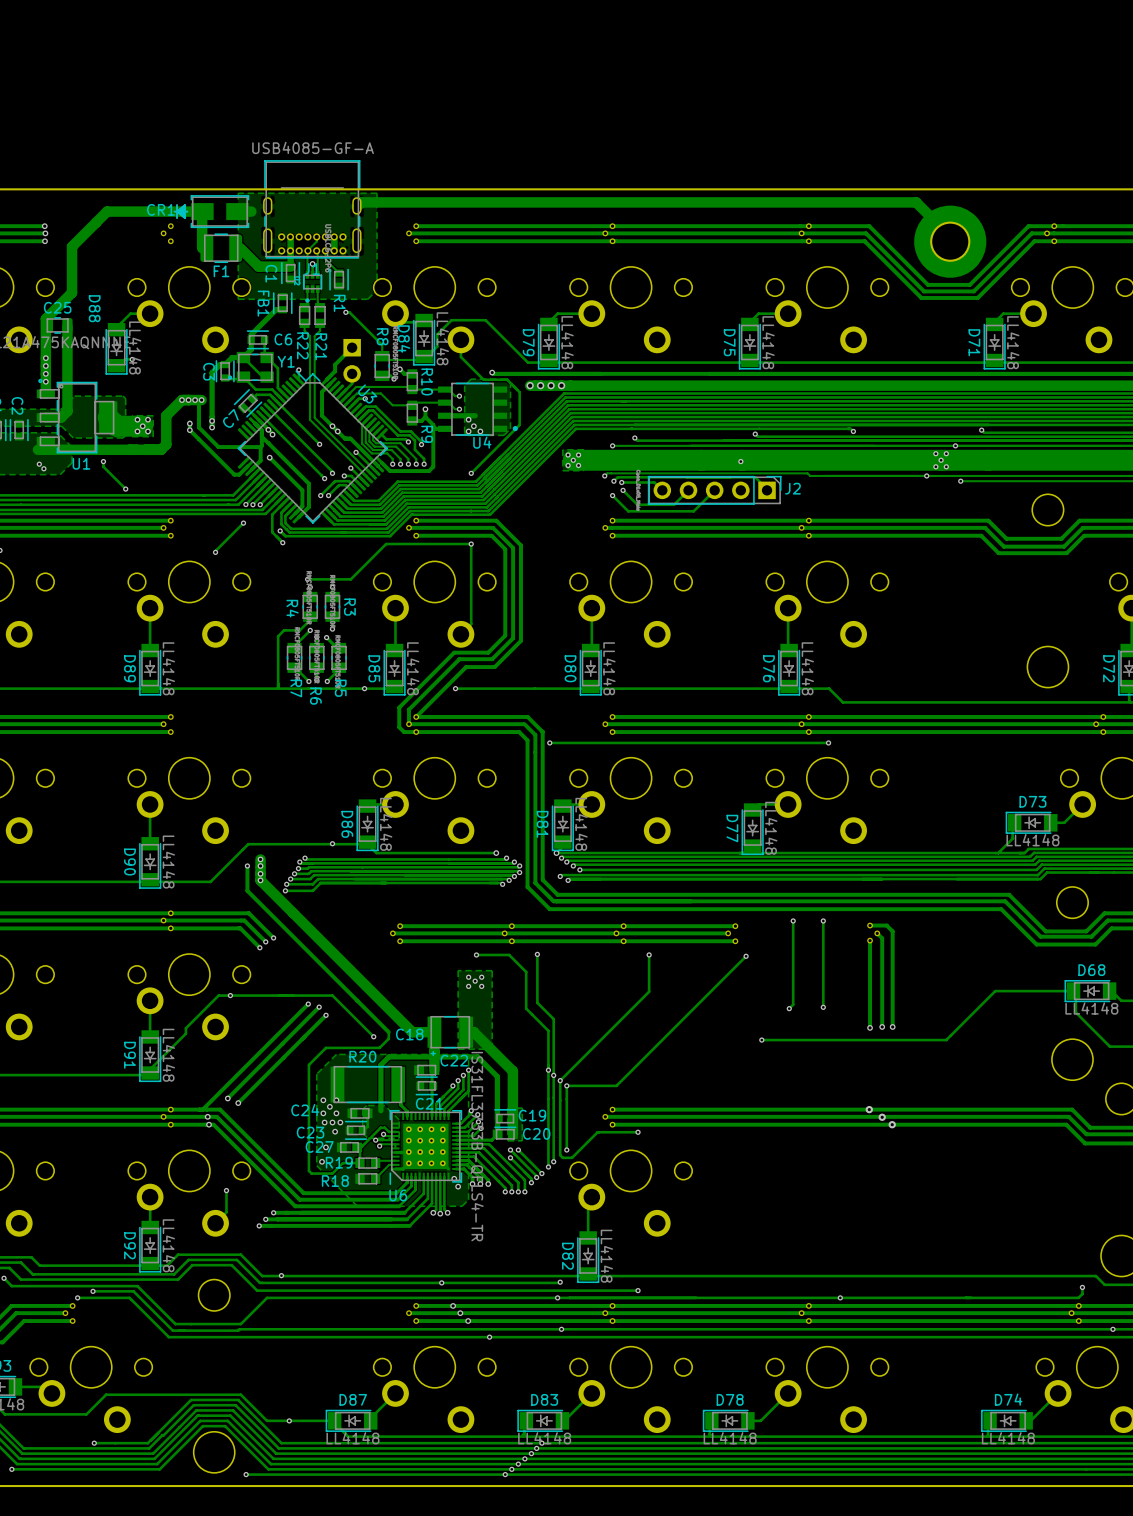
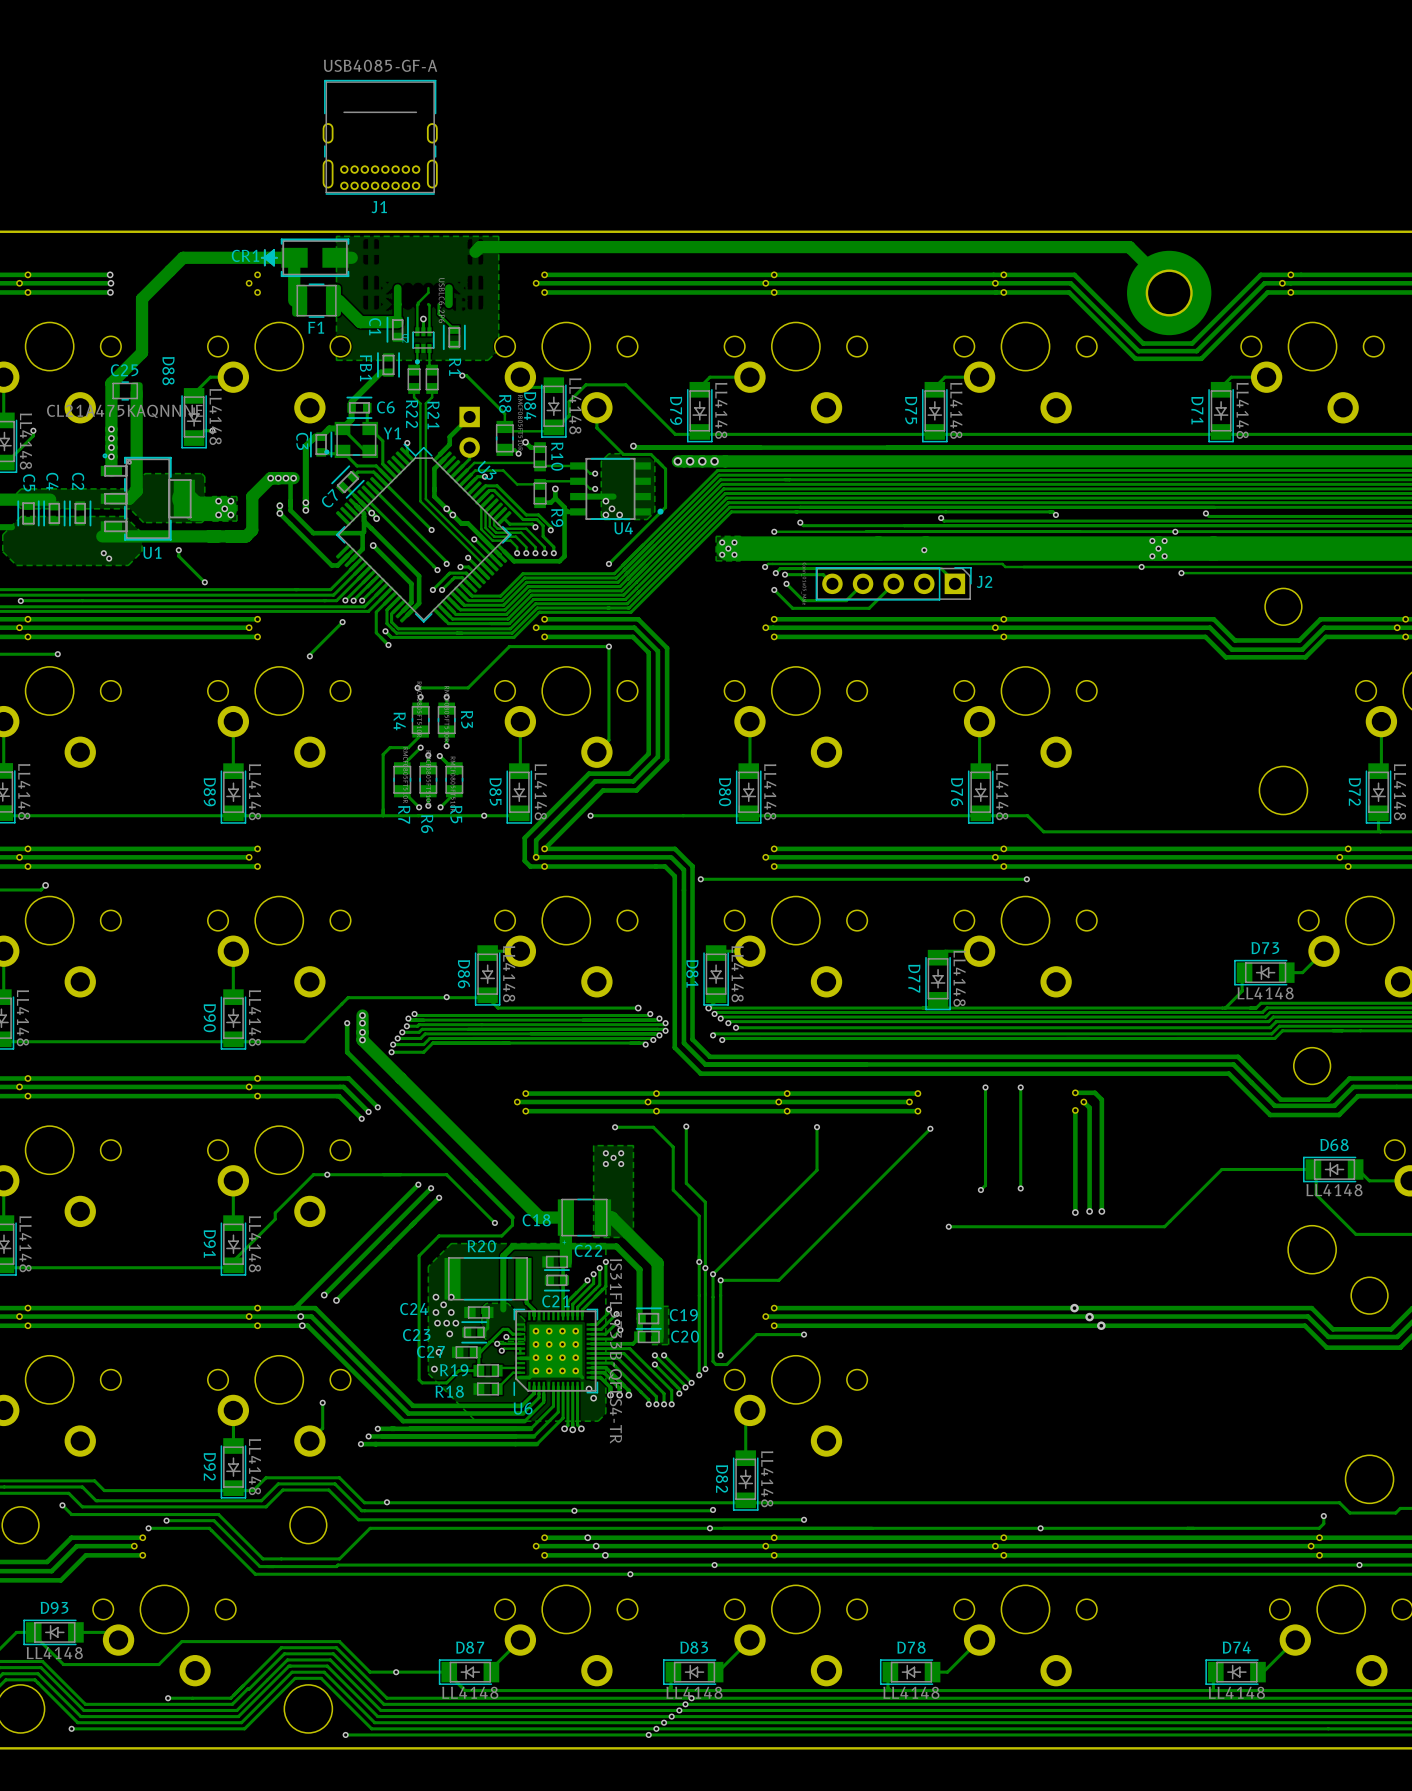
J1 position: (312, 209) -> (380, 137)

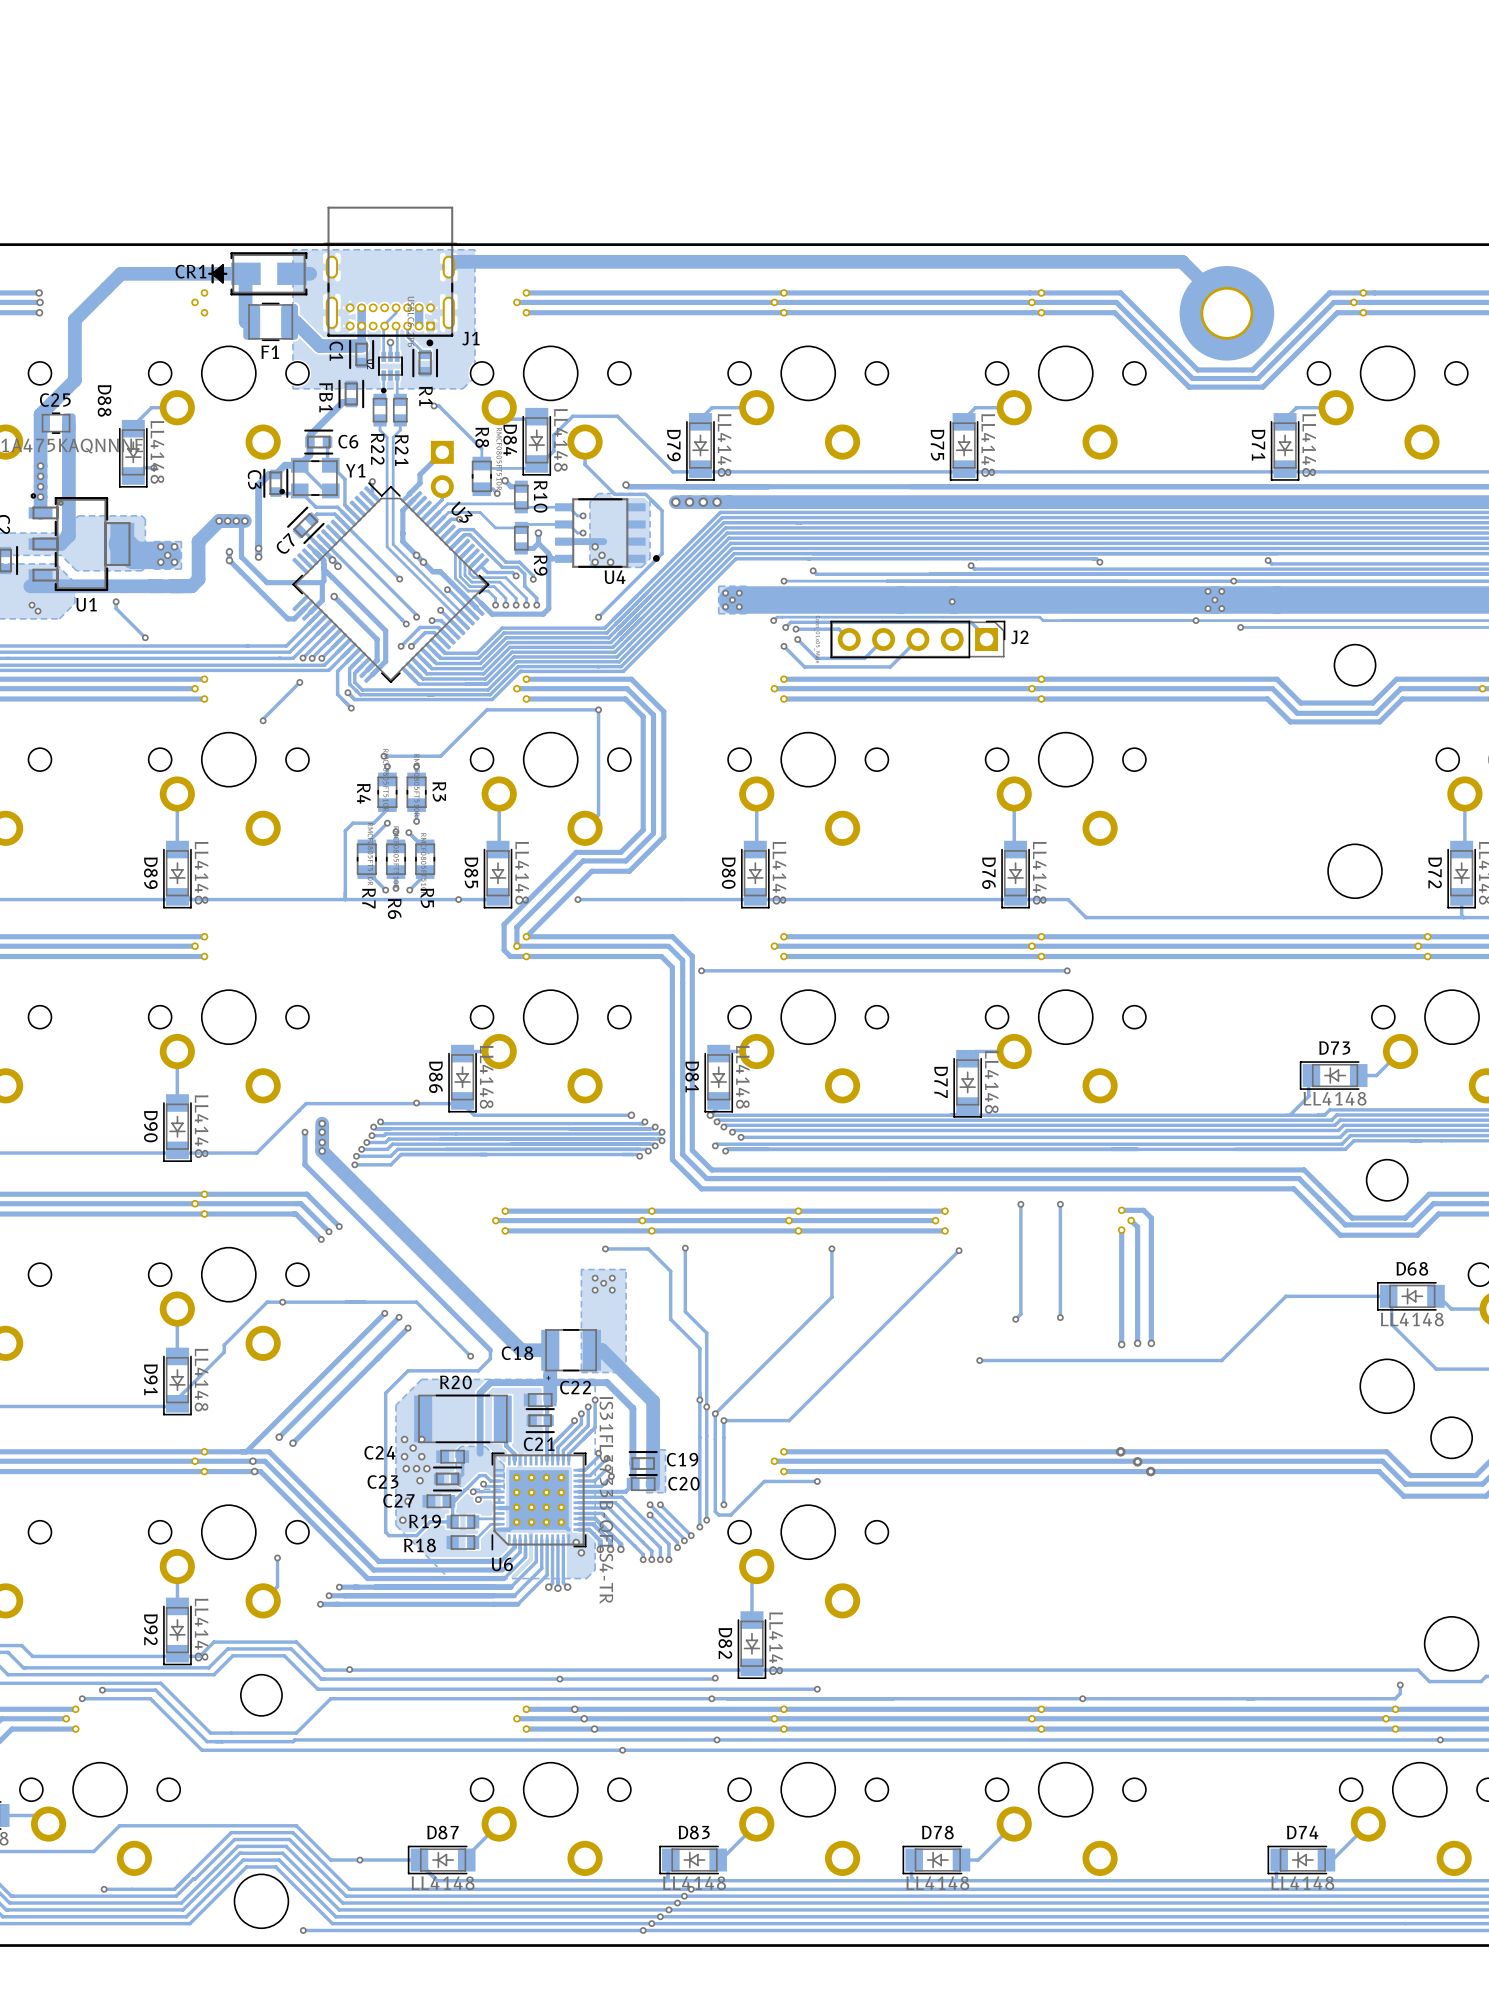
J1 value: USB4085-GF-A (380, 65) -> none
J1 footprint: [322, 79, 438, 195] -> [323, 206, 458, 347]
J1 name position: J1 (379, 207) -> J1 (470, 338)

